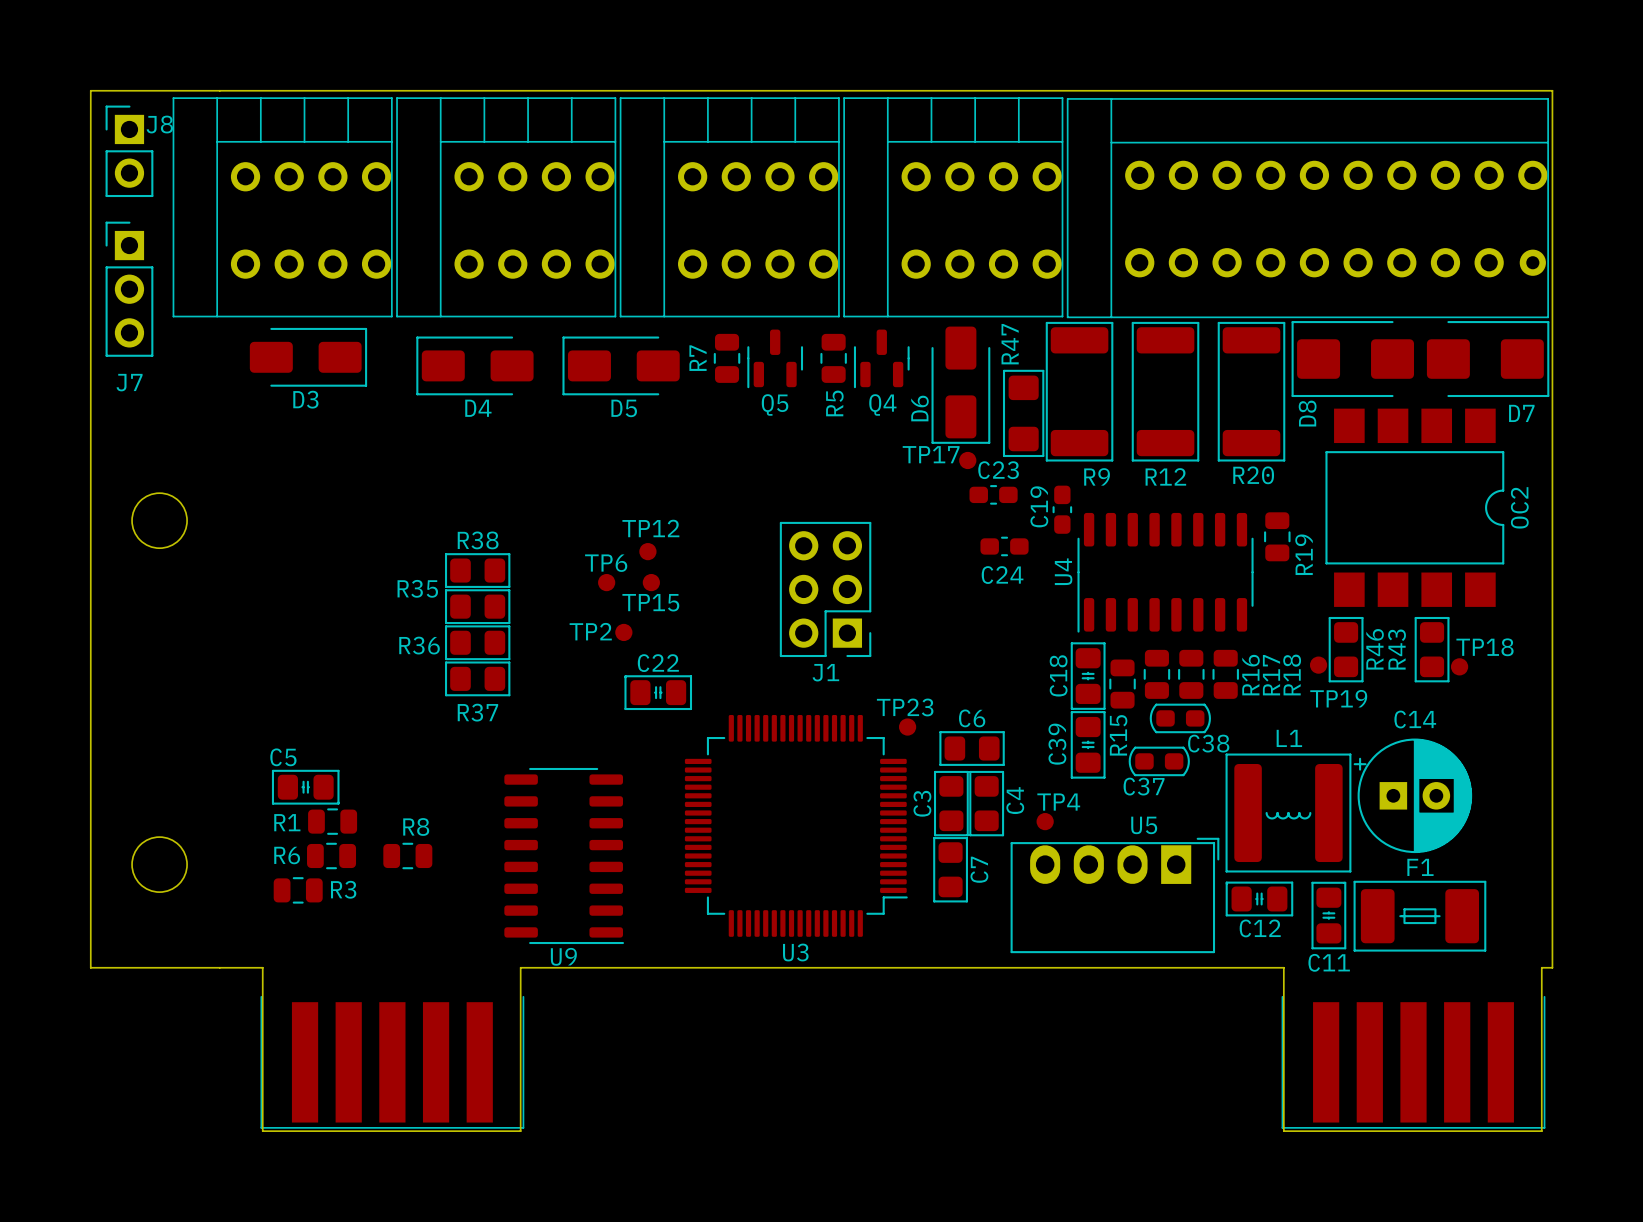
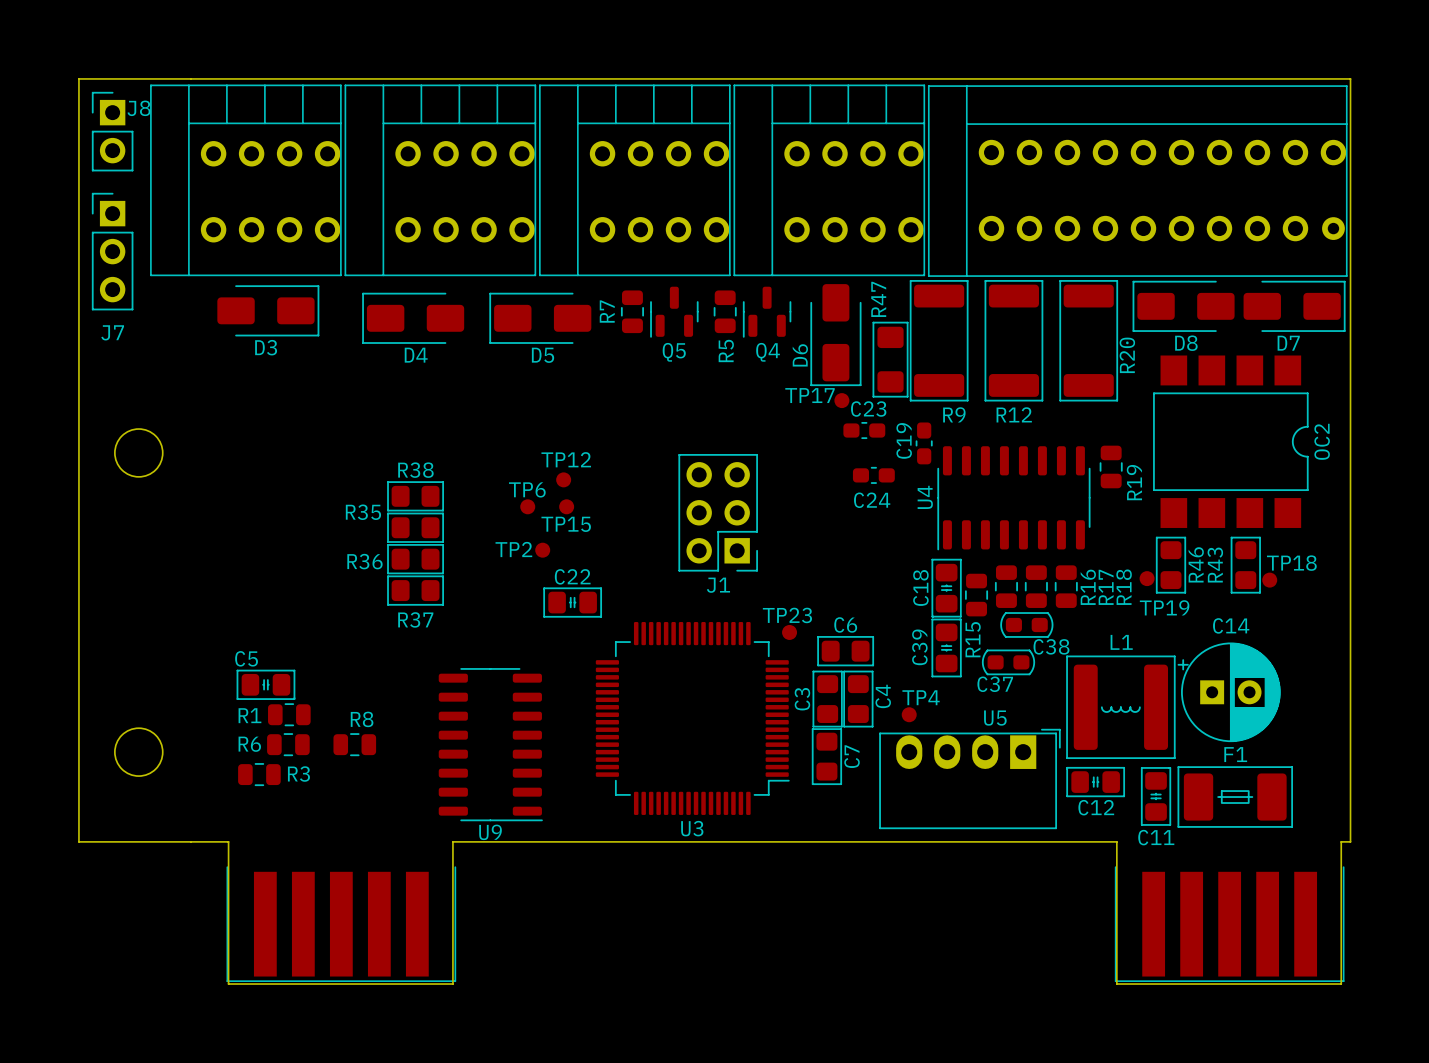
D8 footprint: [1291, 321, 1415, 398] -> [1132, 280, 1235, 332]
D7 footprint: [1426, 321, 1550, 398] -> [1243, 280, 1346, 332]
D8 name position: D8 (1307, 413) -> D8 (1186, 343)
D7 name position: D7 (1521, 413) -> D7 (1288, 343)
R20 name rotation: 0° (1253, 475) -> 90° counterclockwise (1127, 355)
R20 name position: R20 (1253, 475) -> R20 (1127, 355)

